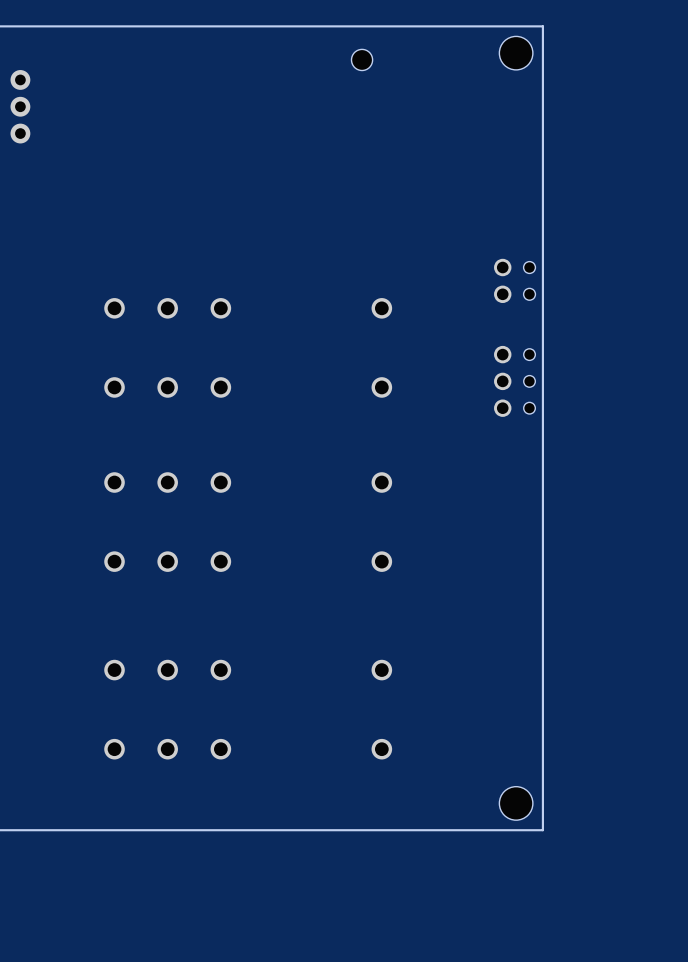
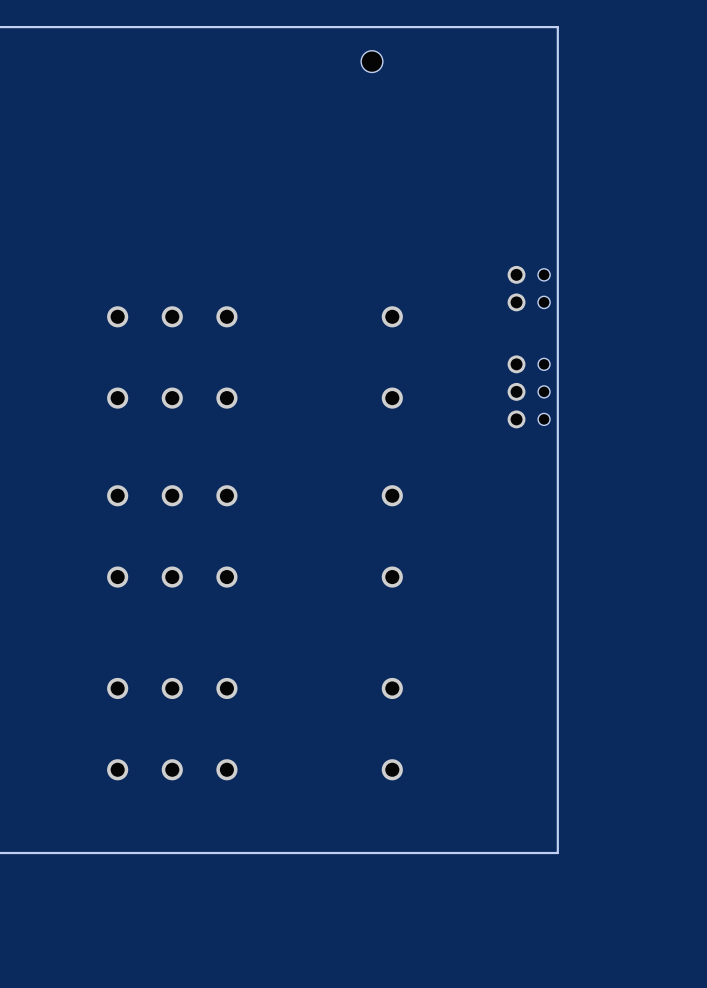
hole: (516, 53) -> none
part: (20, 106) -> none
hole: (516, 803) -> none

